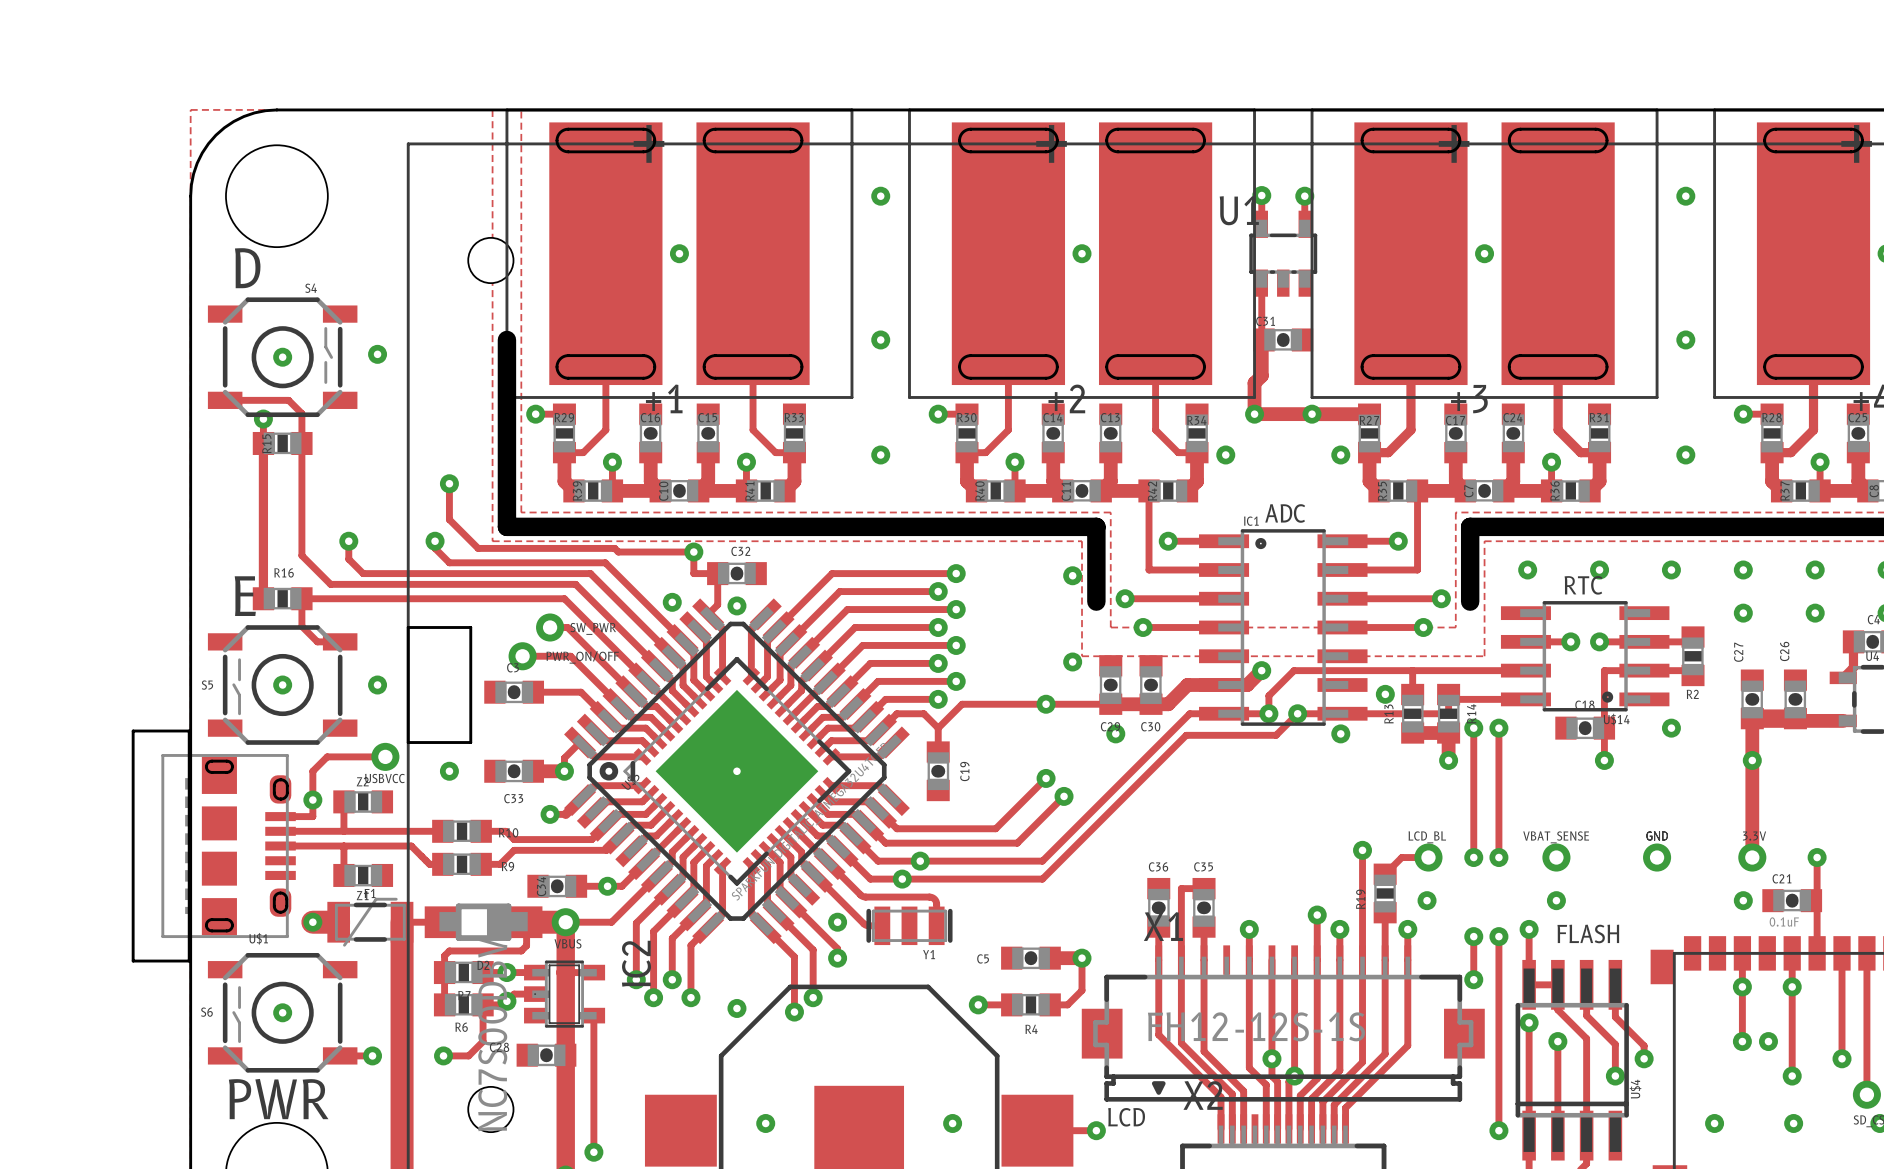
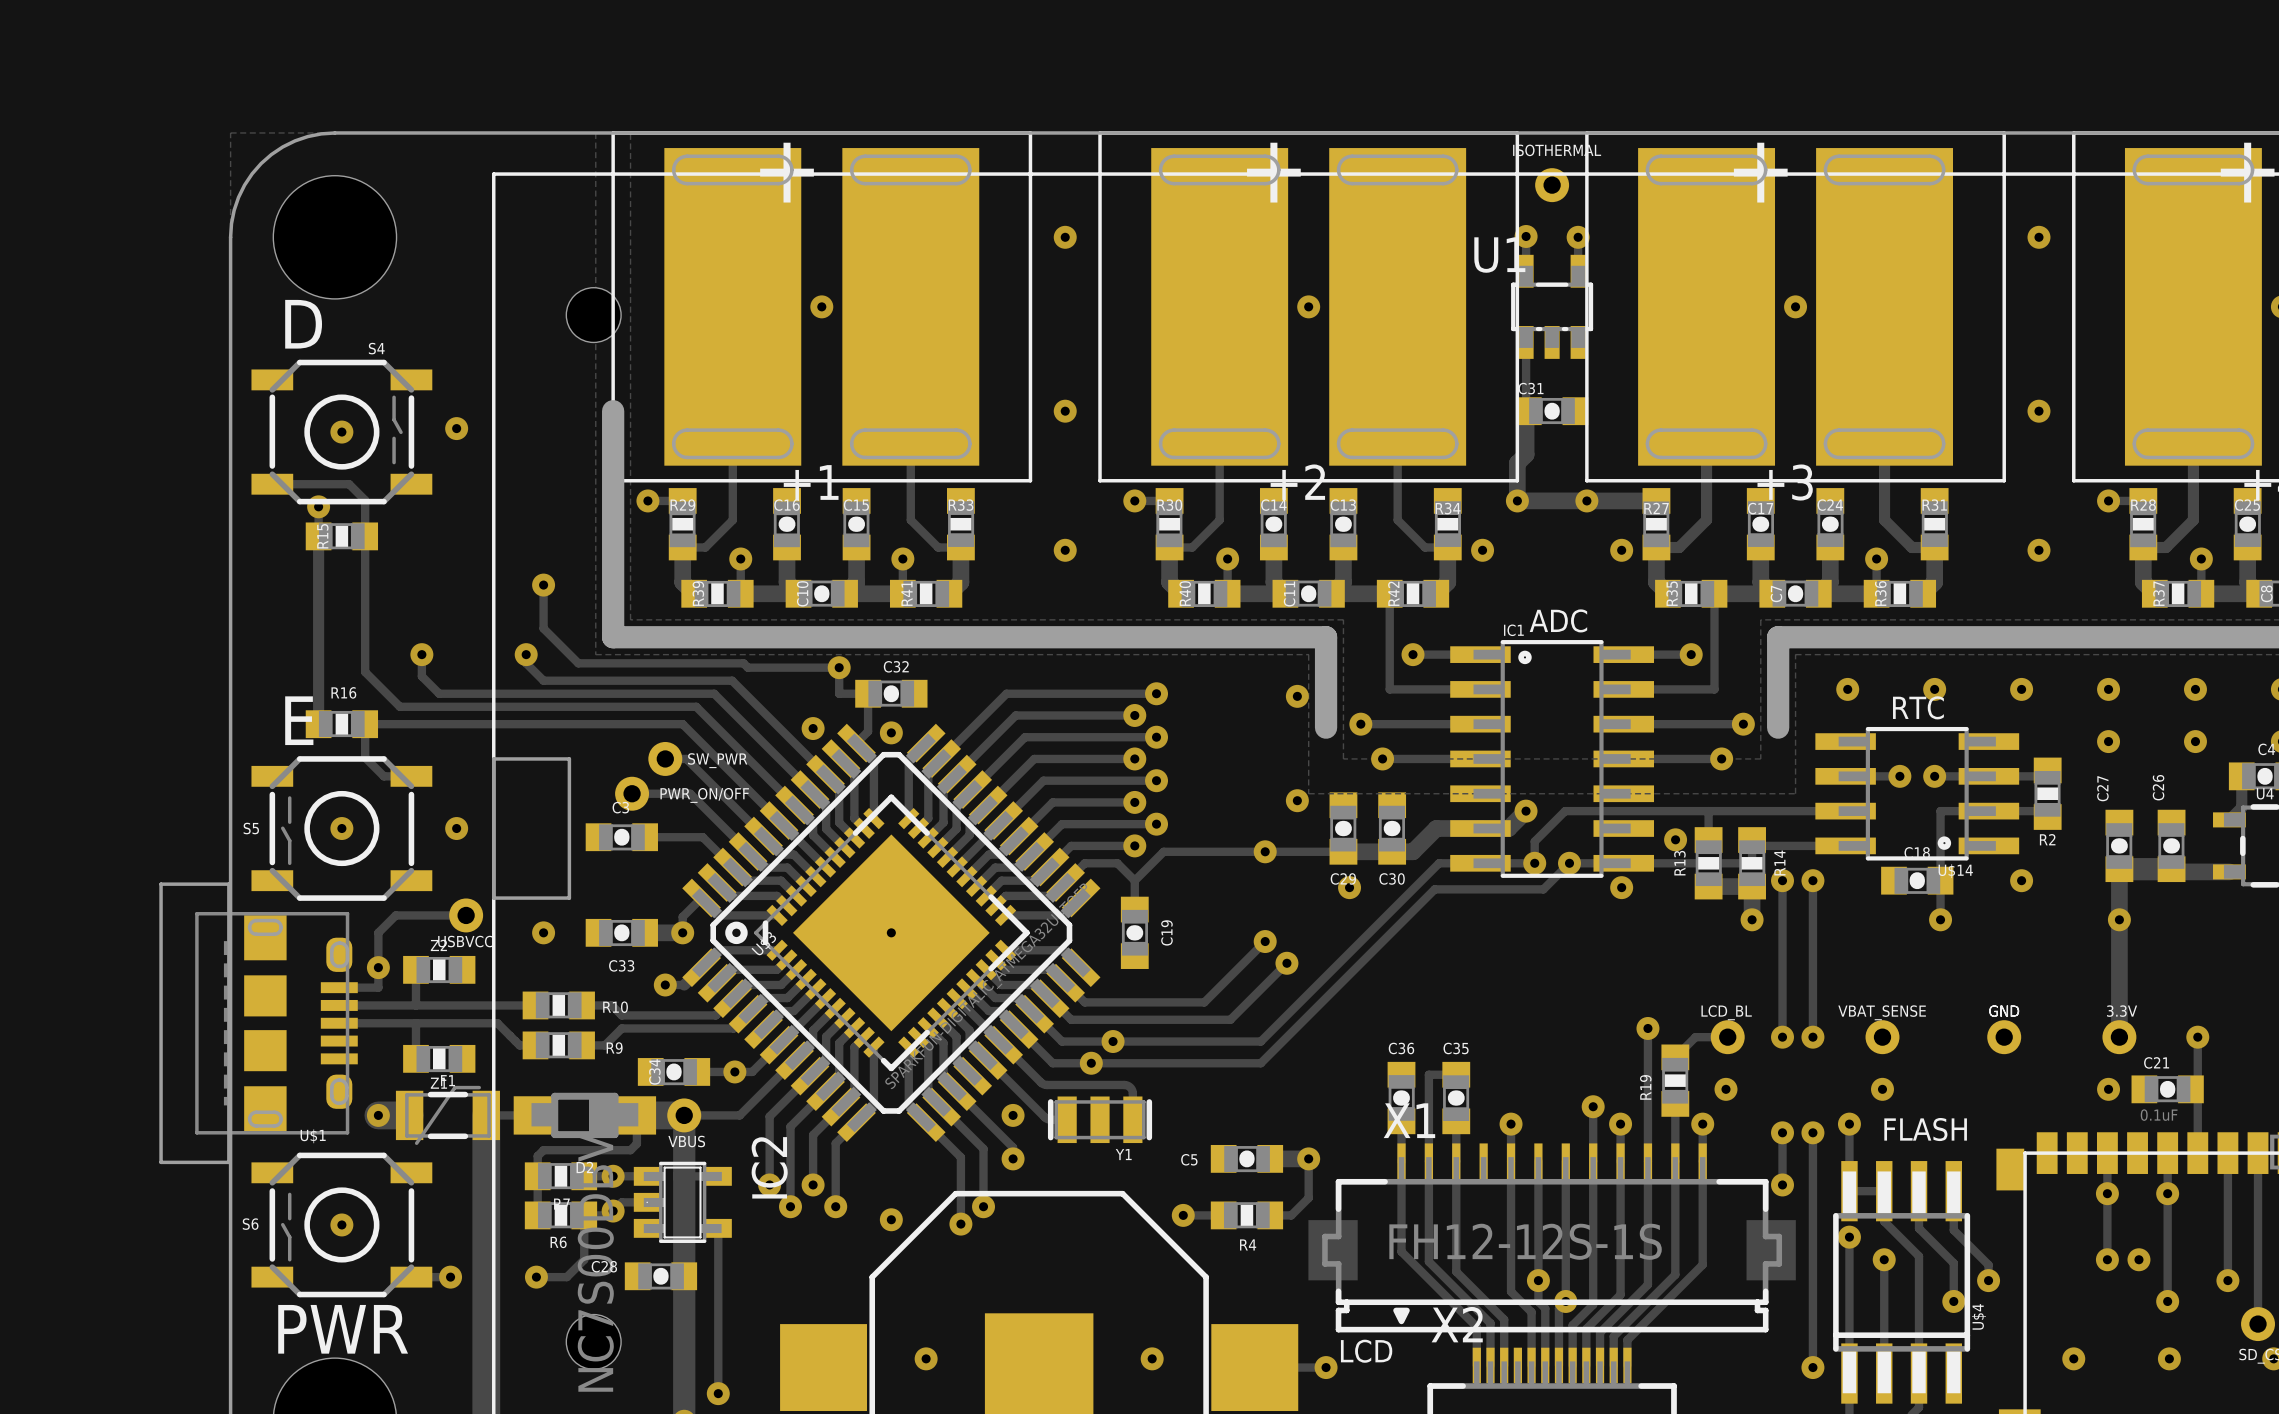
text: none -> ISOTHERMAL (1557, 150)
part: none -> (1552, 185)

